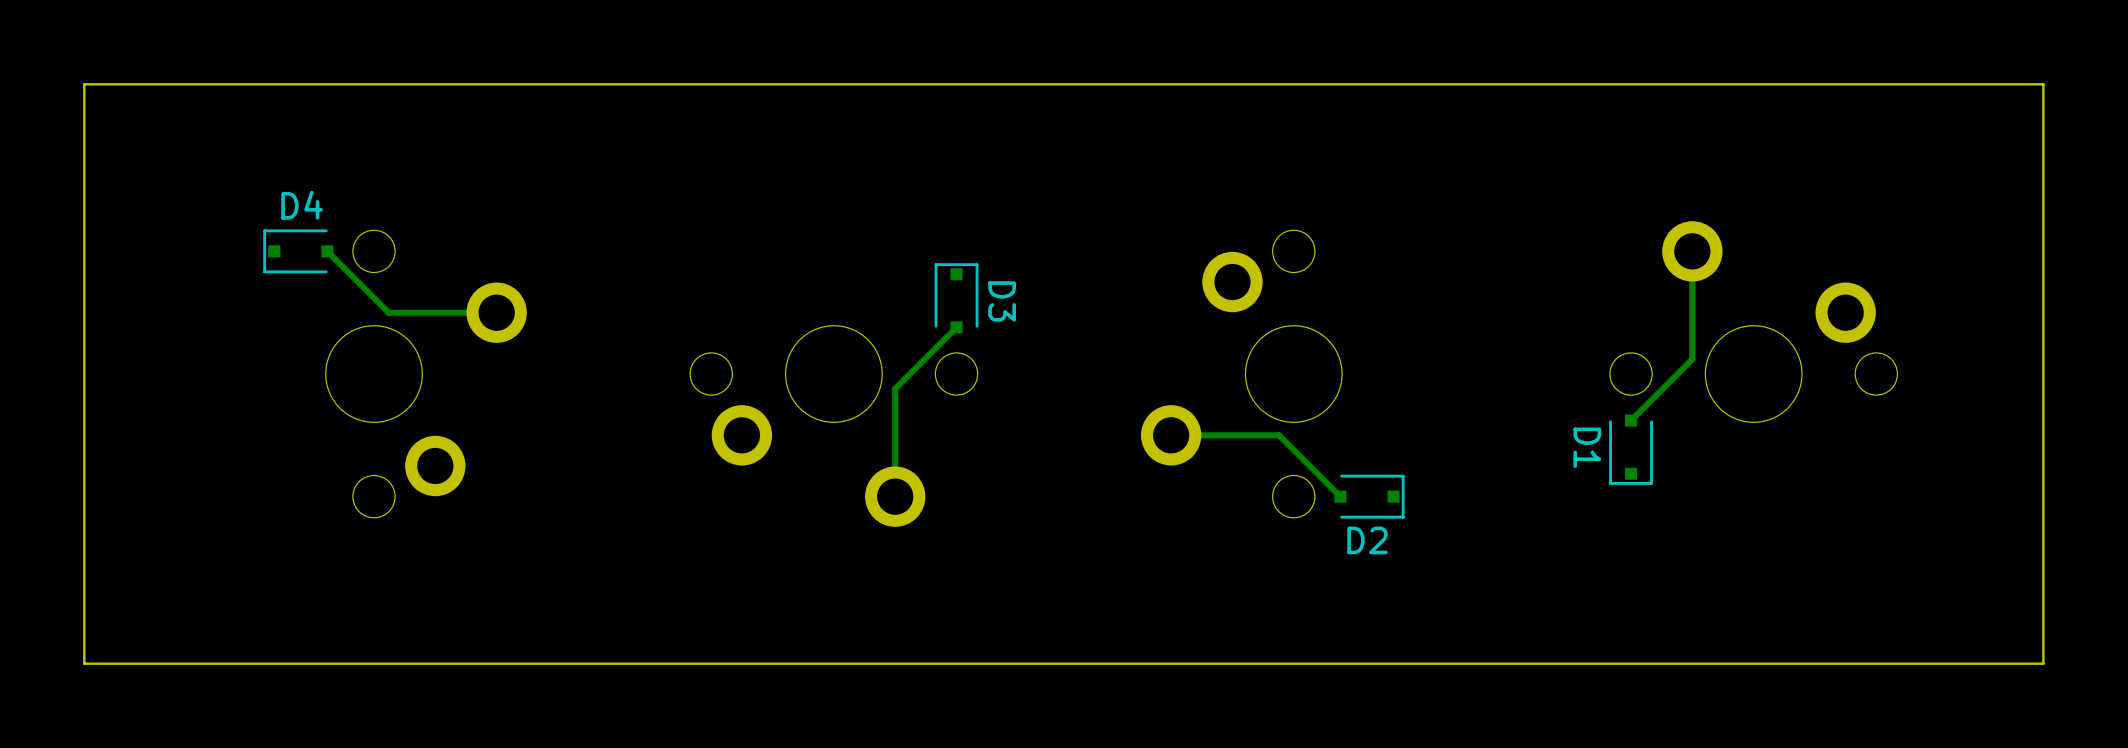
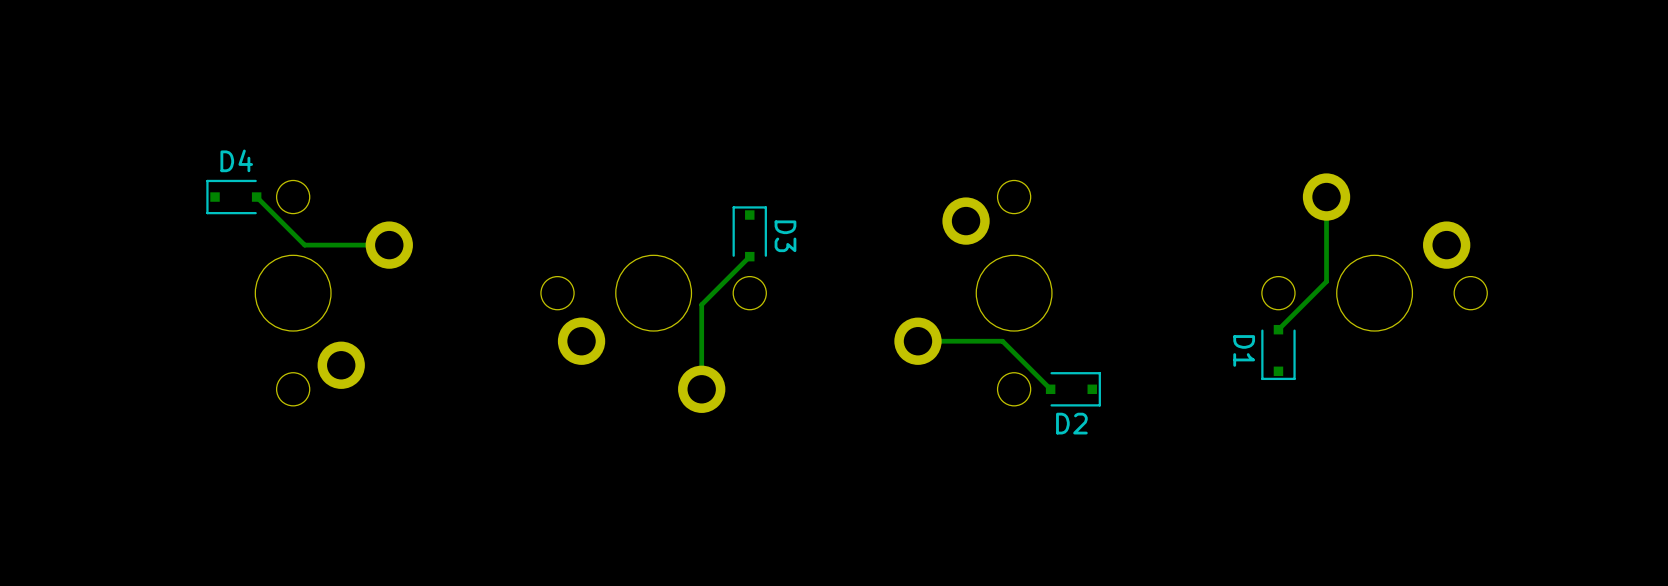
board edge: (2043, 84) (2043, 663) (84, 663) (84, 84) (2043, 84) -> none

